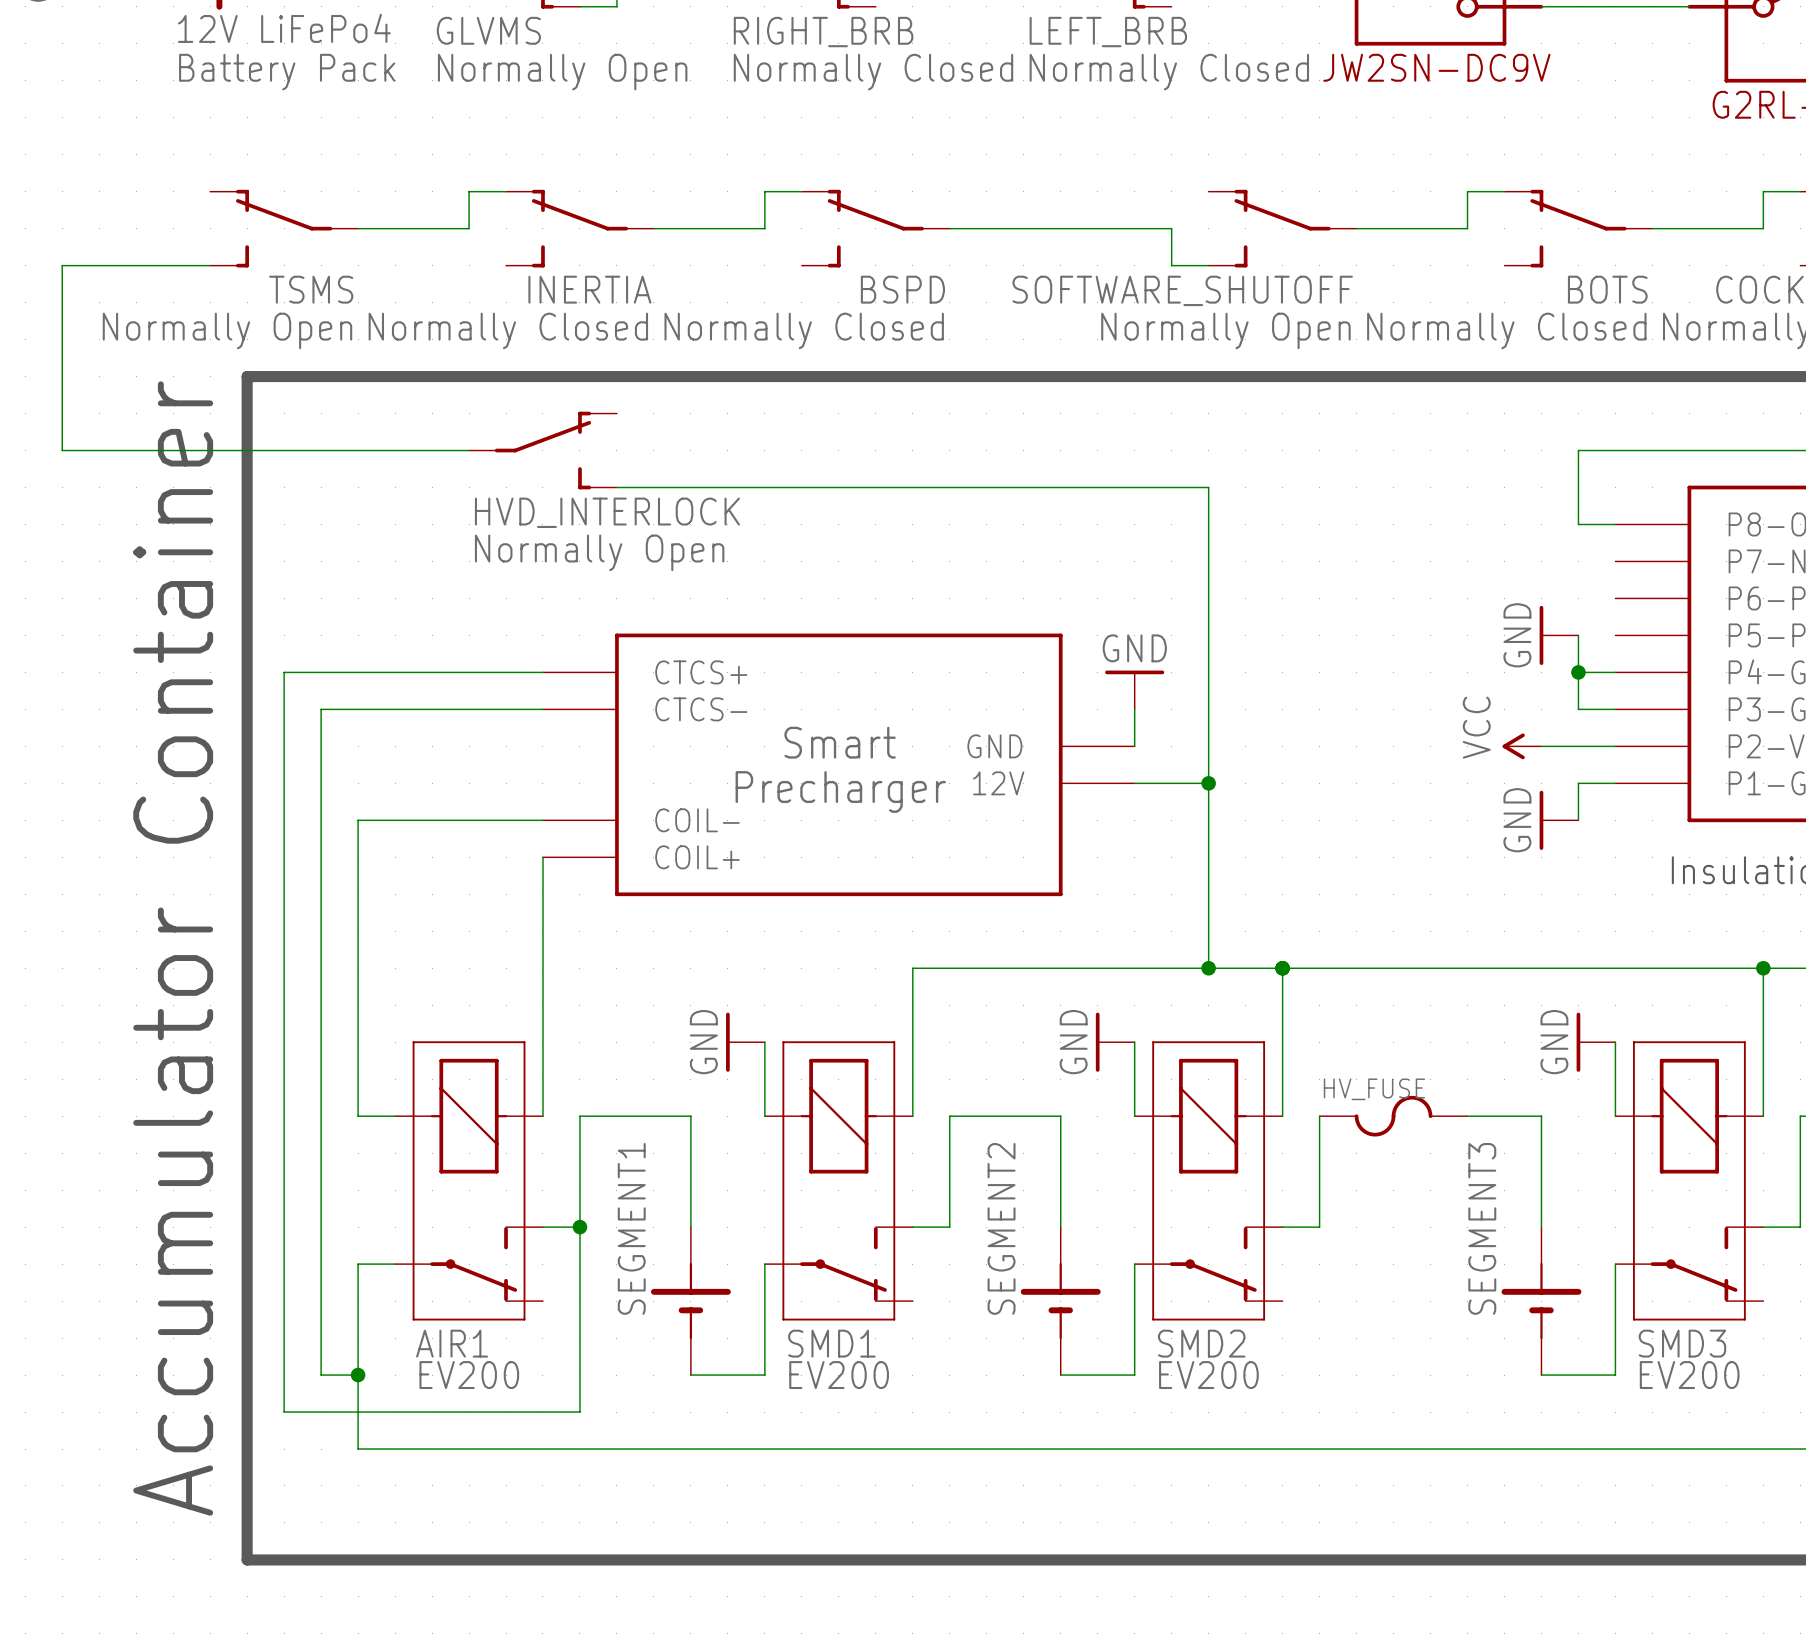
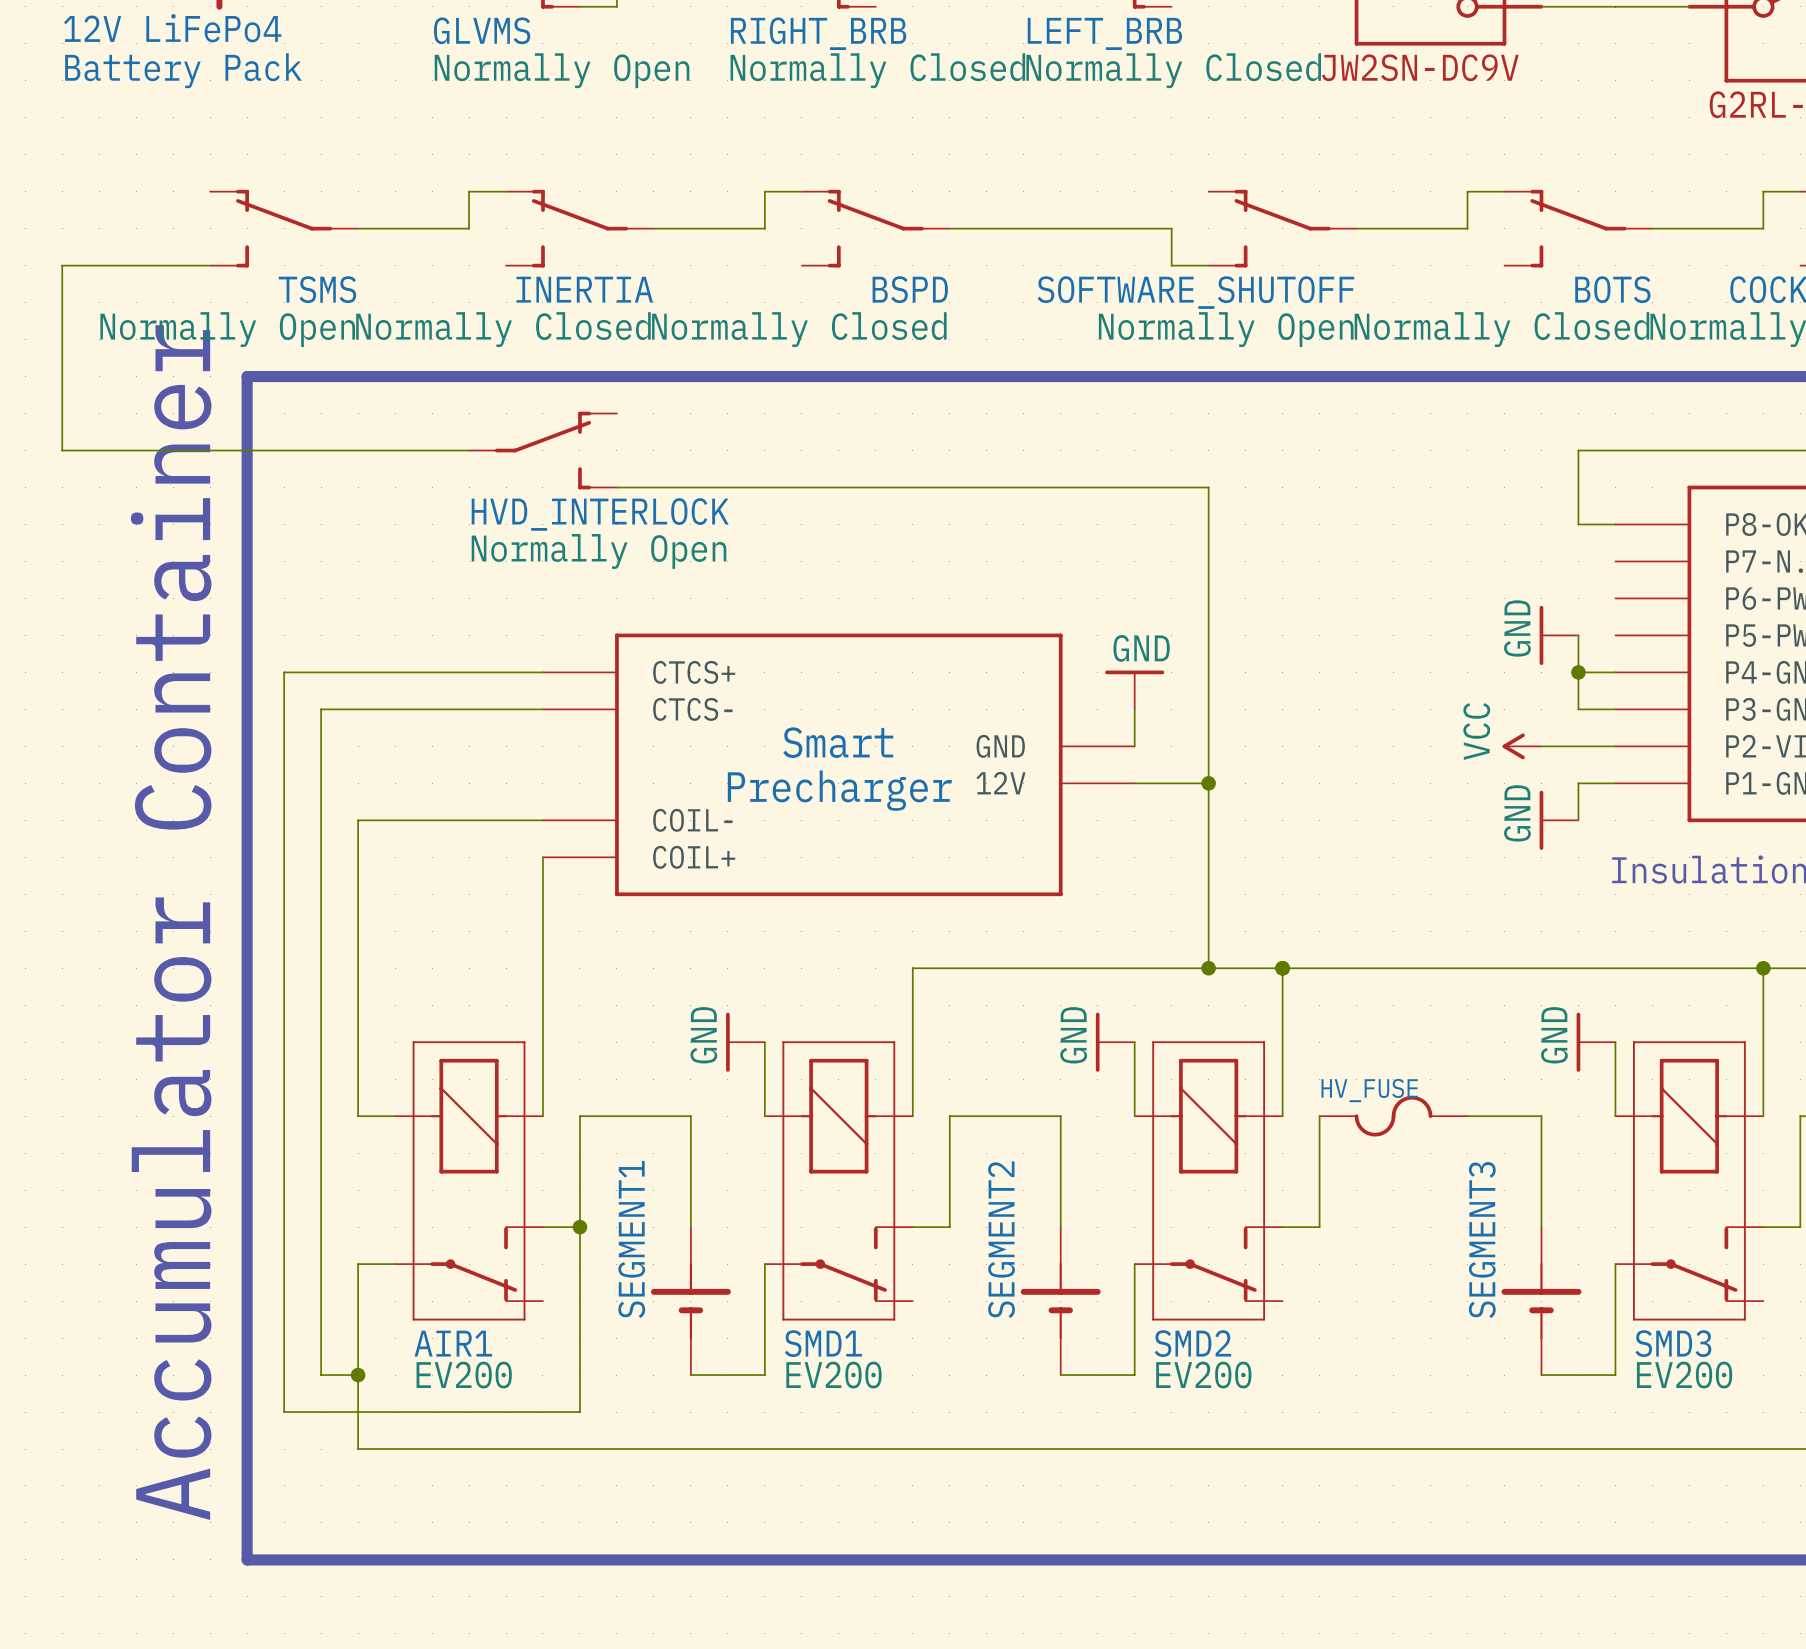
text position: 12V LiFePo4 (284, 28) -> 12V LiFePo4 (172, 28)
text position: Battery Pack (287, 72) -> Battery Pack (183, 70)

